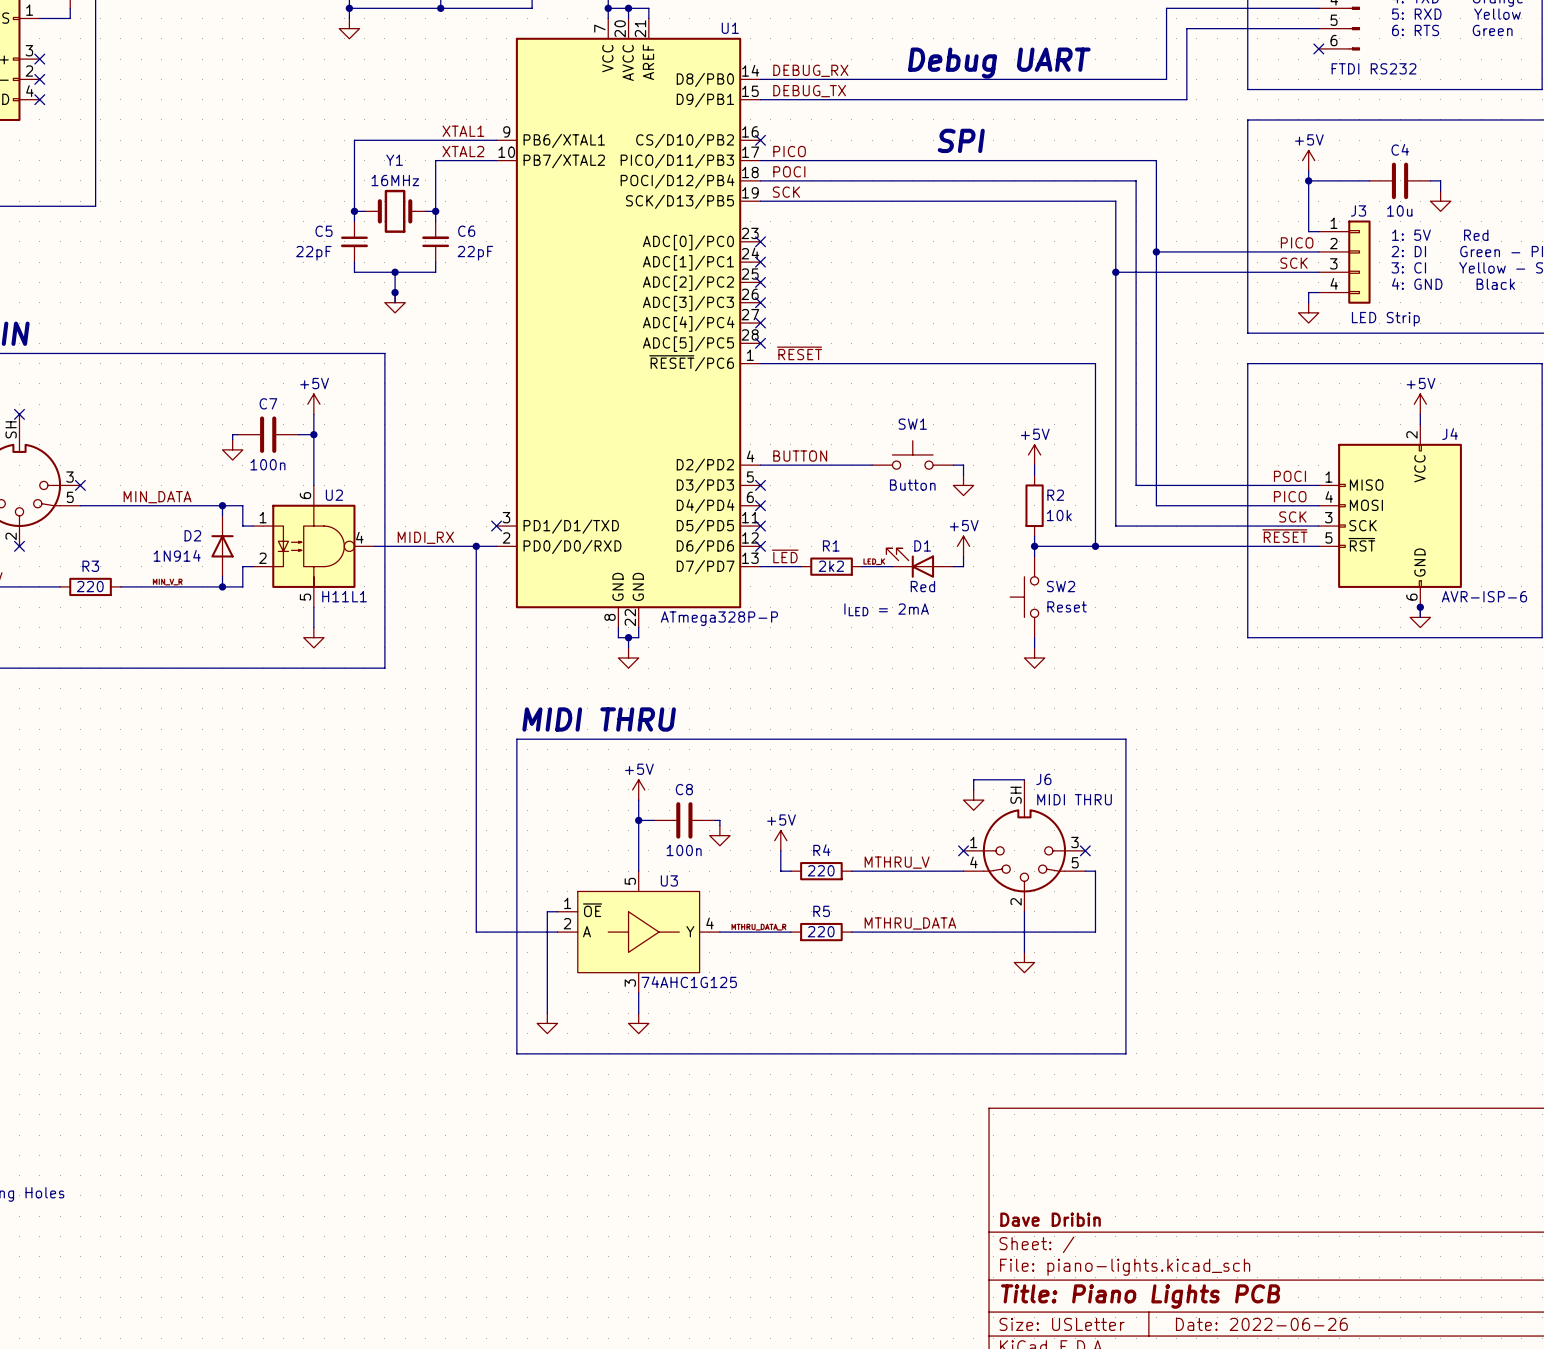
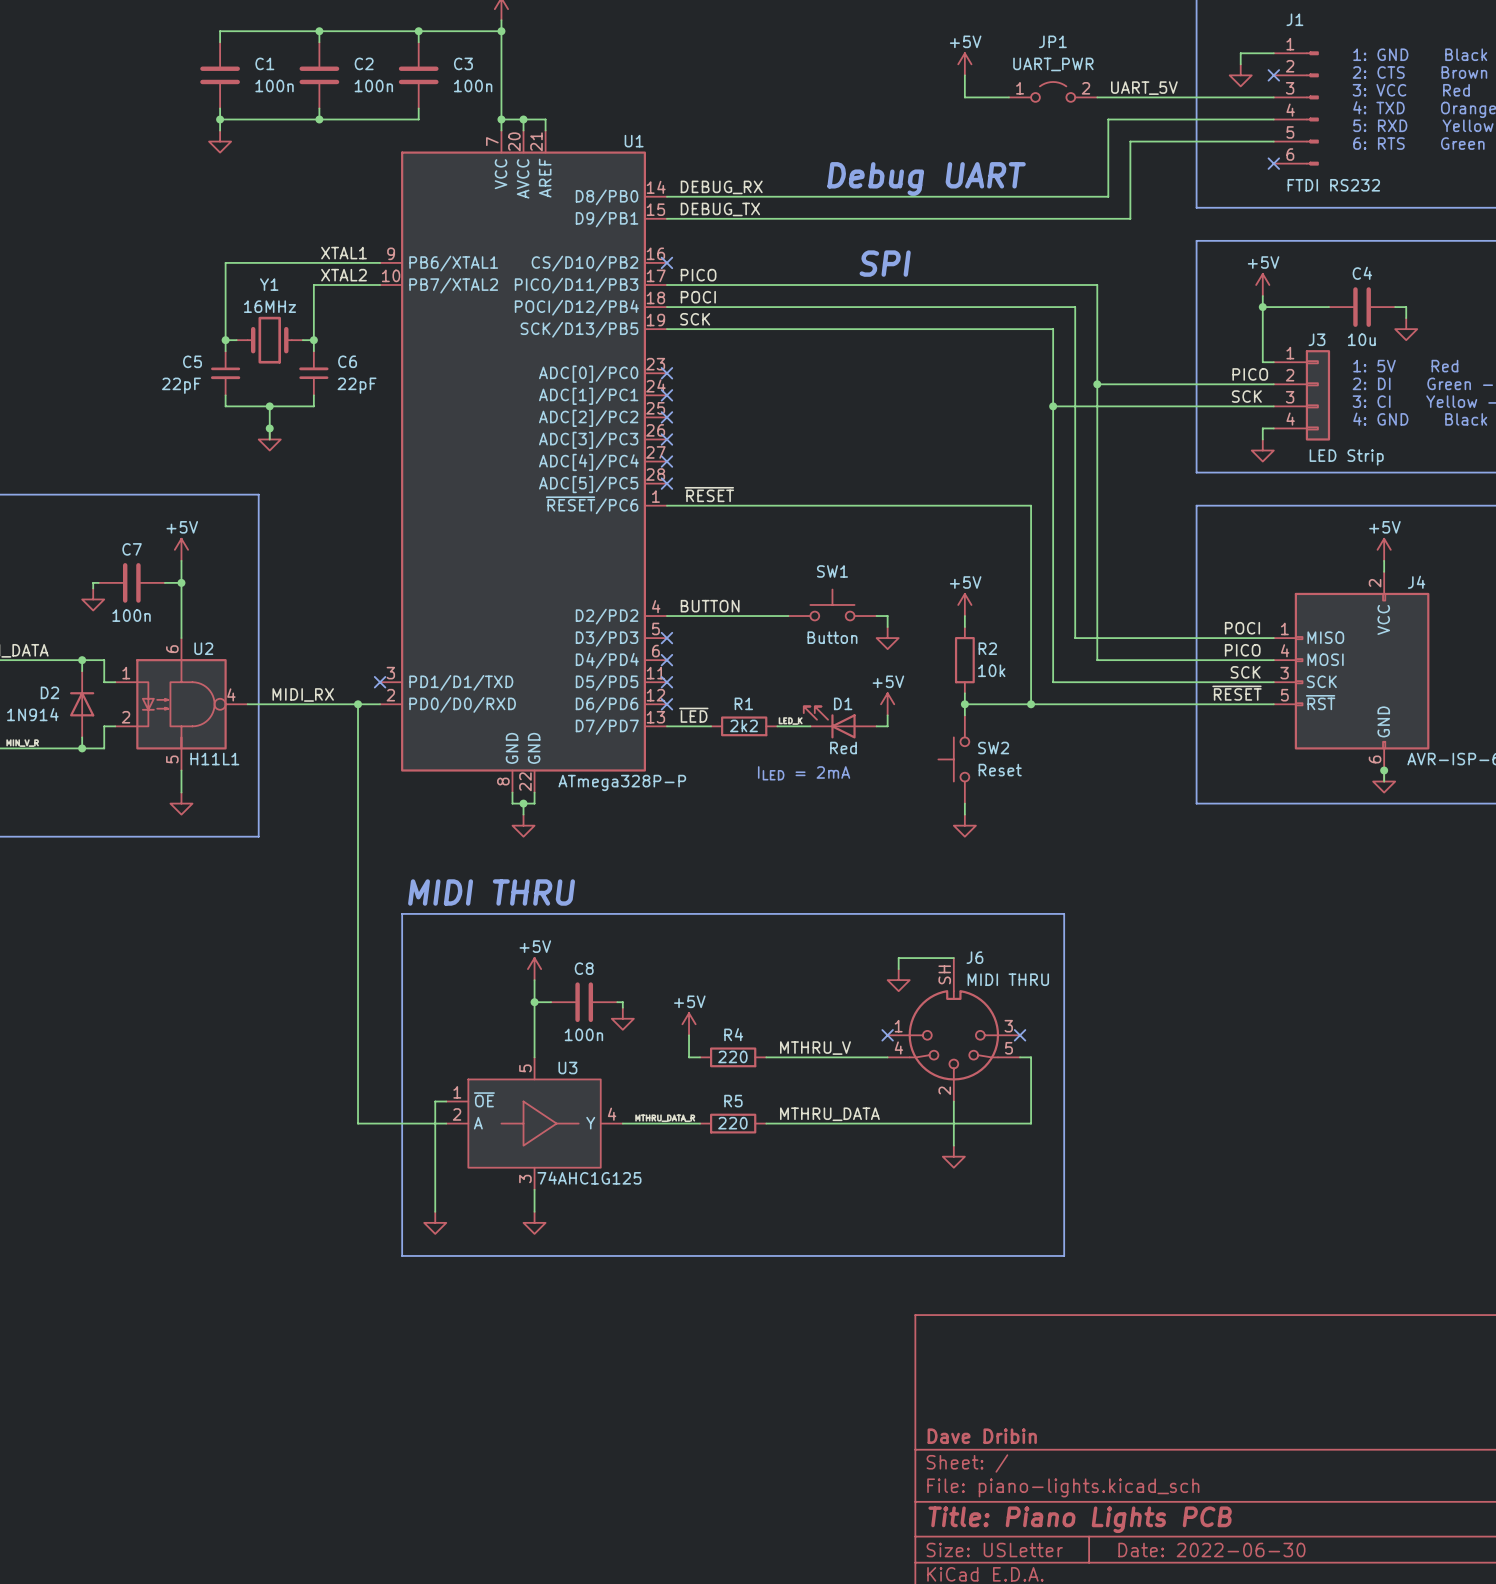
title block: Date: 2022-06-26 (1261, 1324) -> Date: 2022-06-30 (1211, 1550)

